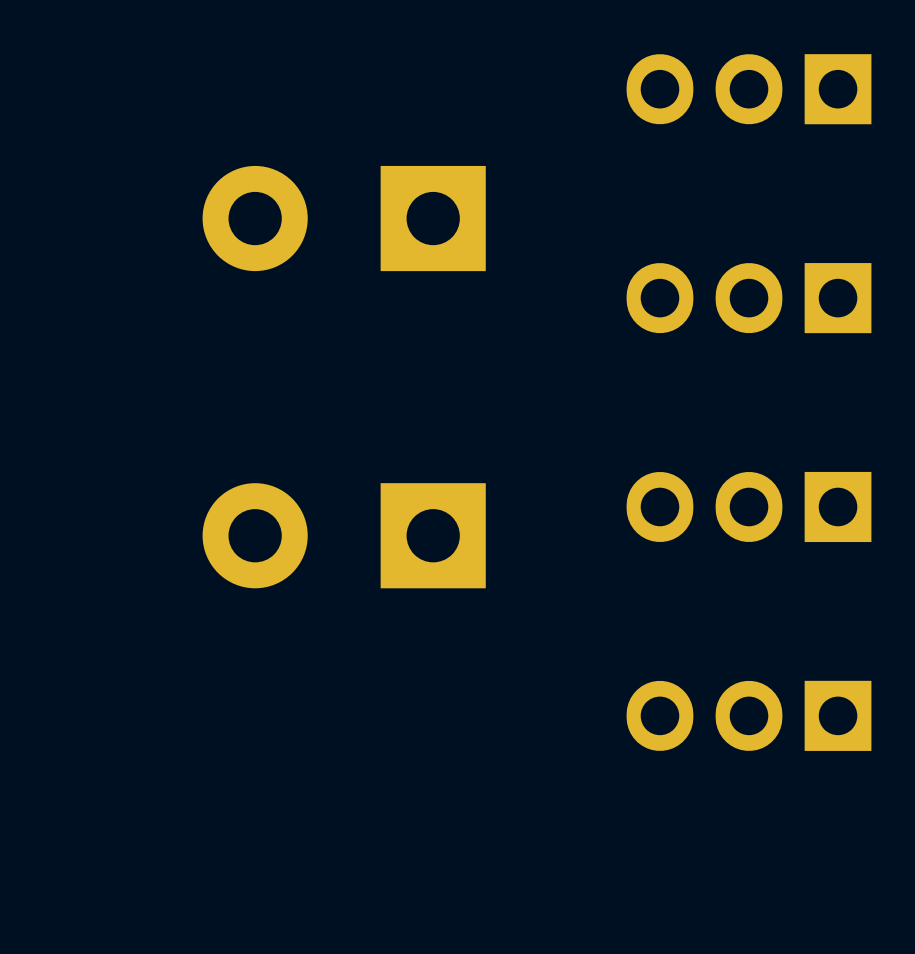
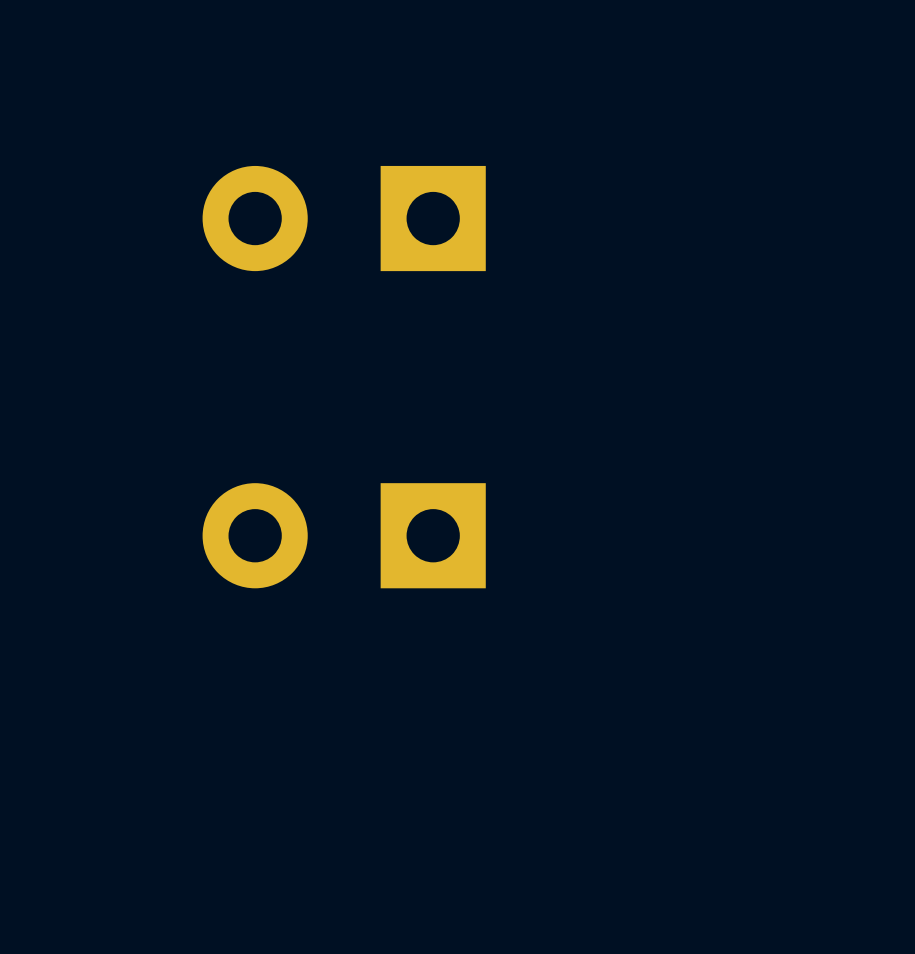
part: (749, 89) -> none
part: (749, 298) -> none
part: (749, 506) -> none
part: (749, 715) -> none

